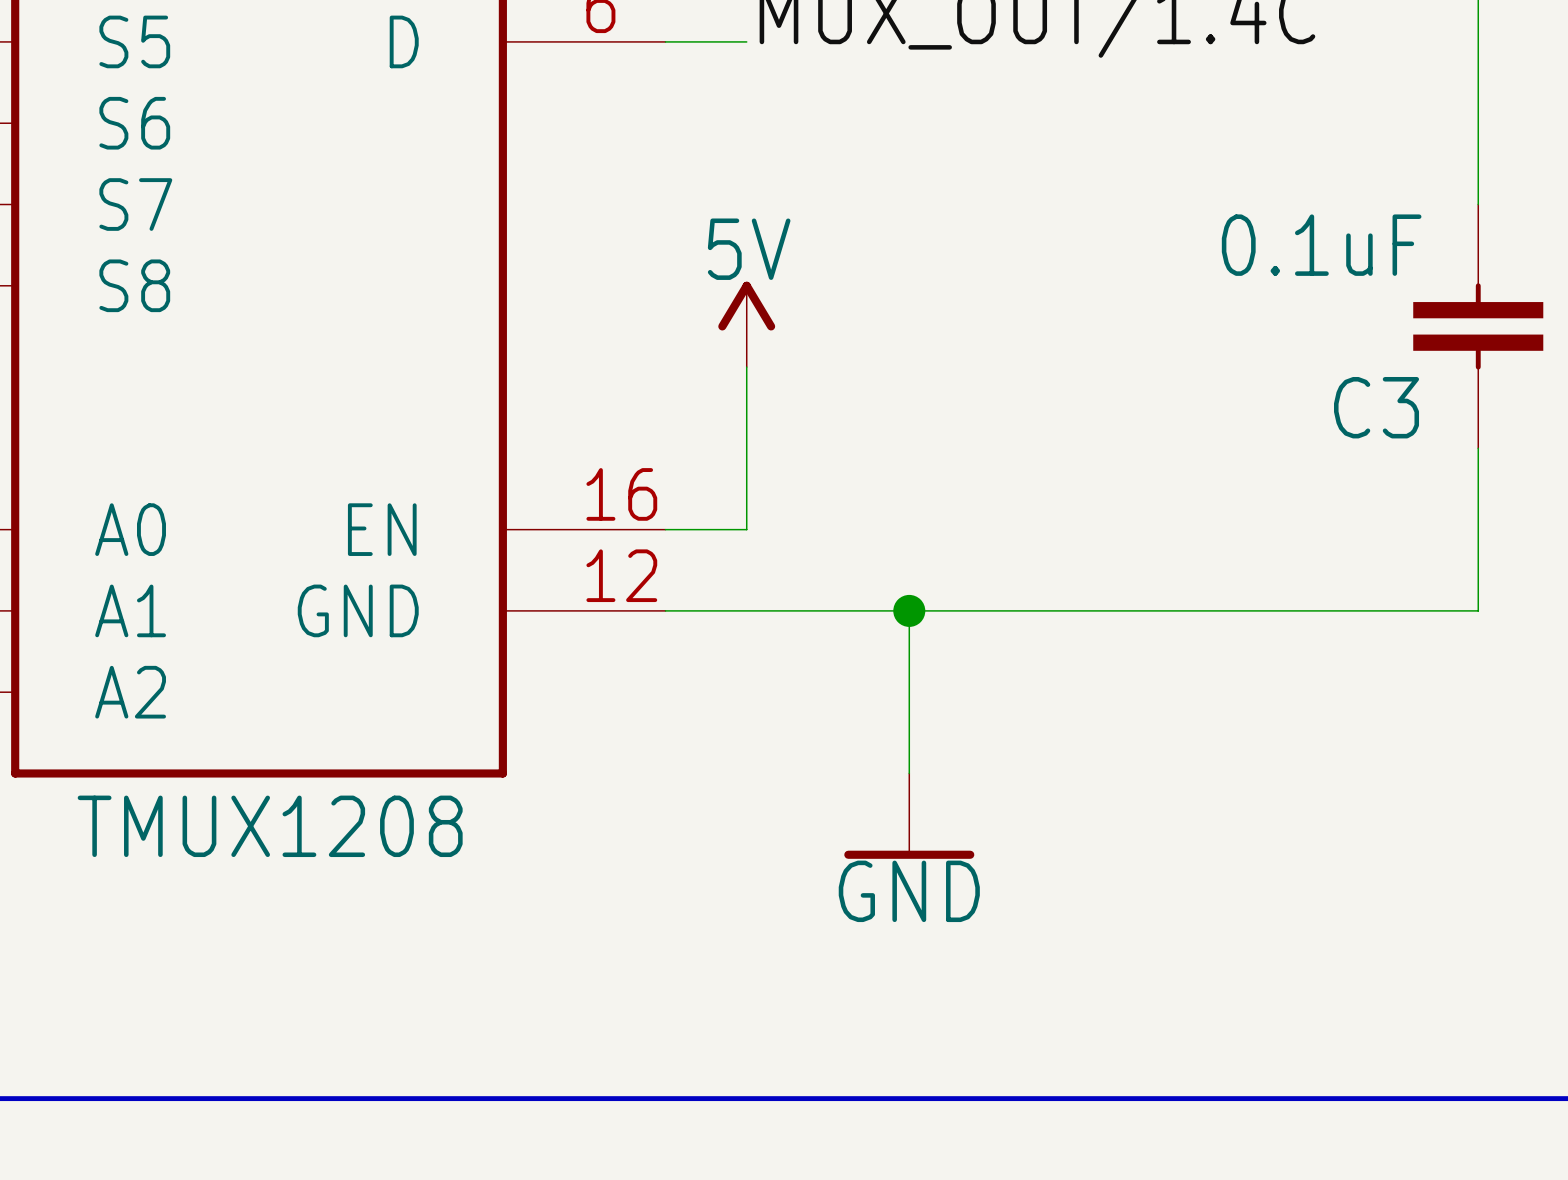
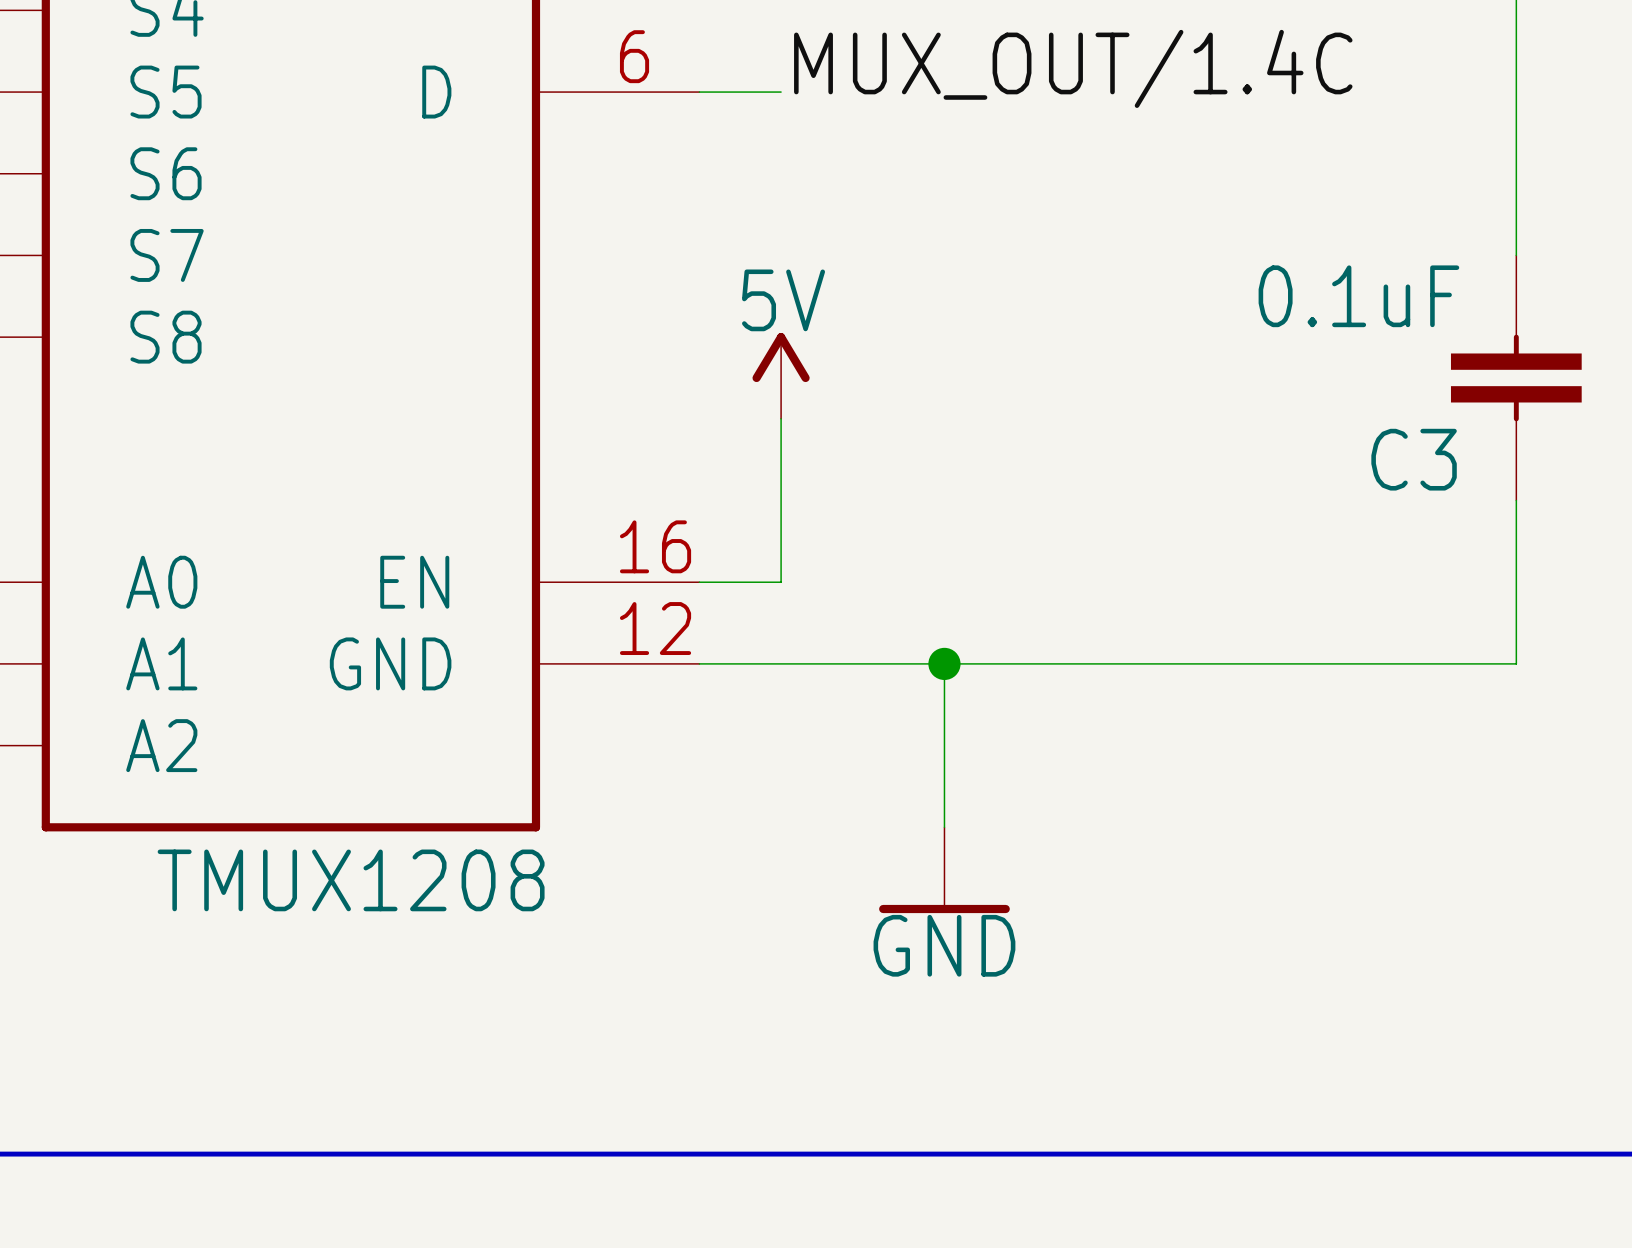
part value position: TMUX1208 (270, 826) -> TMUX1208 (351, 880)

